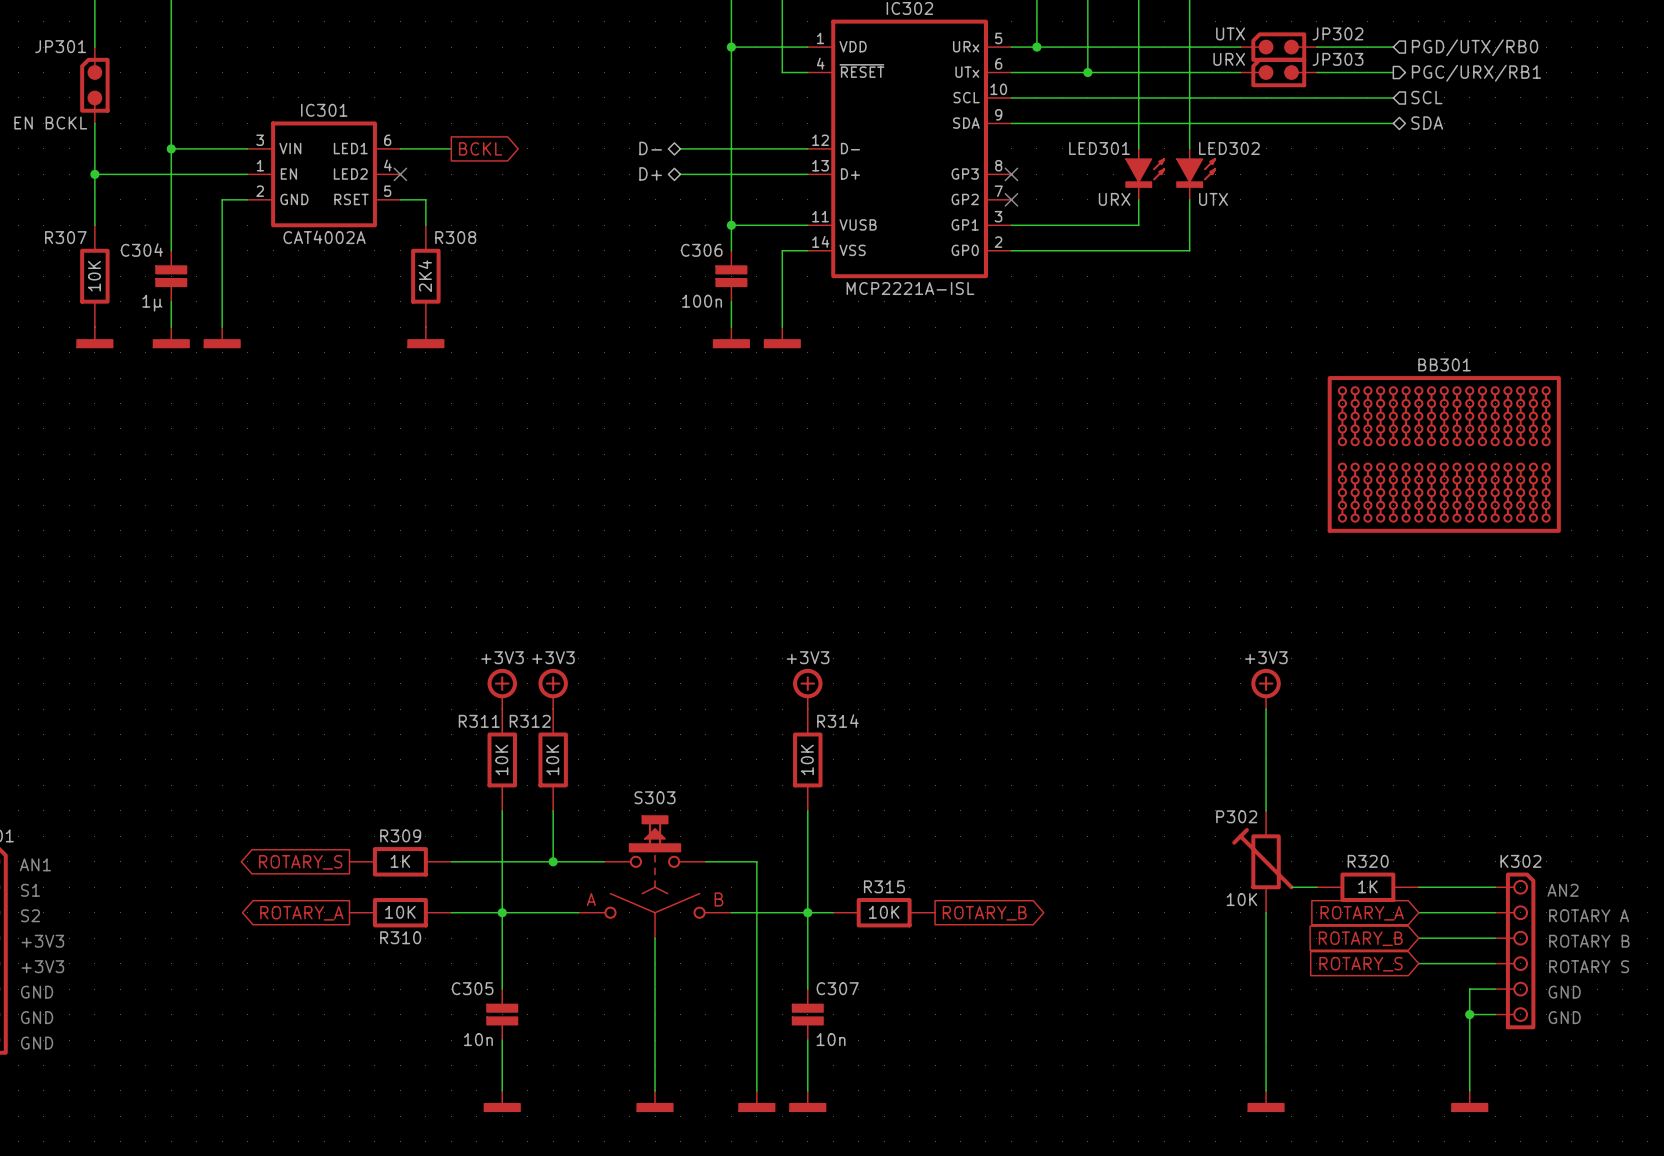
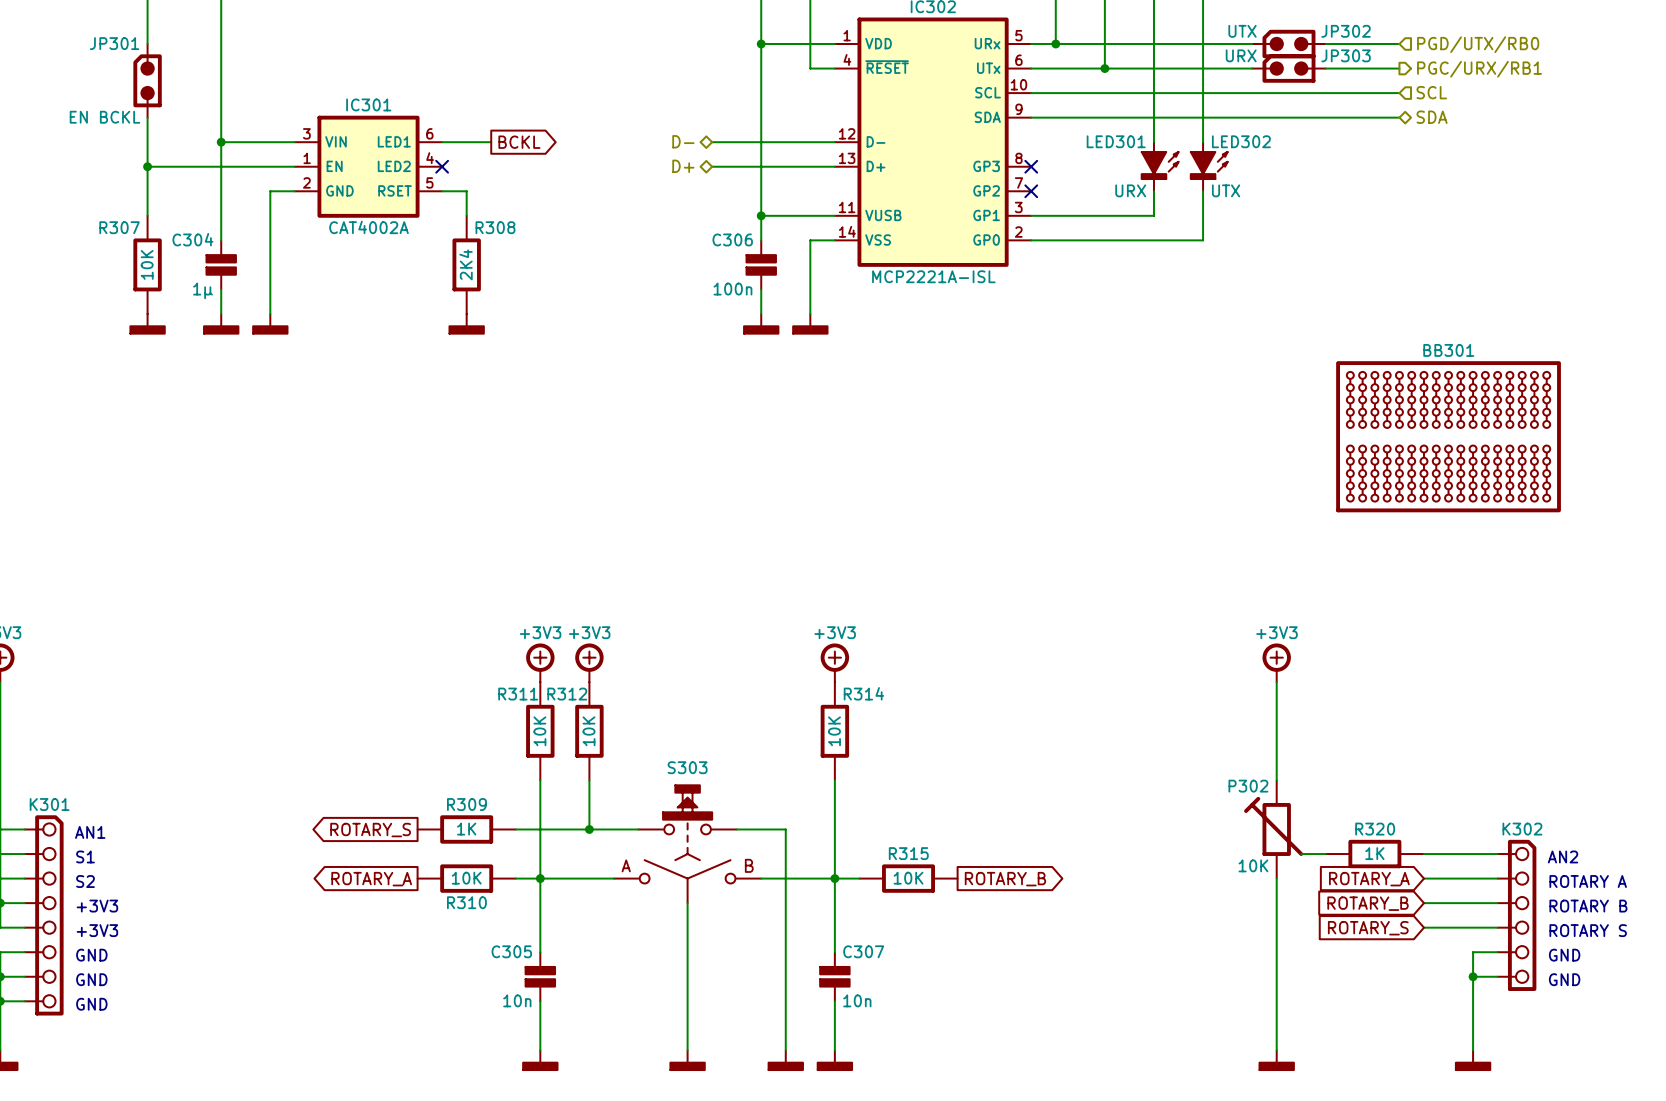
R309 position: (400, 861) -> (466, 829)
global label position: ROTARY_S (300, 862) -> ROTARY_S (370, 830)
R310 position: (400, 912) -> (466, 878)
global label position: ROTARY_A (301, 913) -> ROTARY_A (371, 879)

